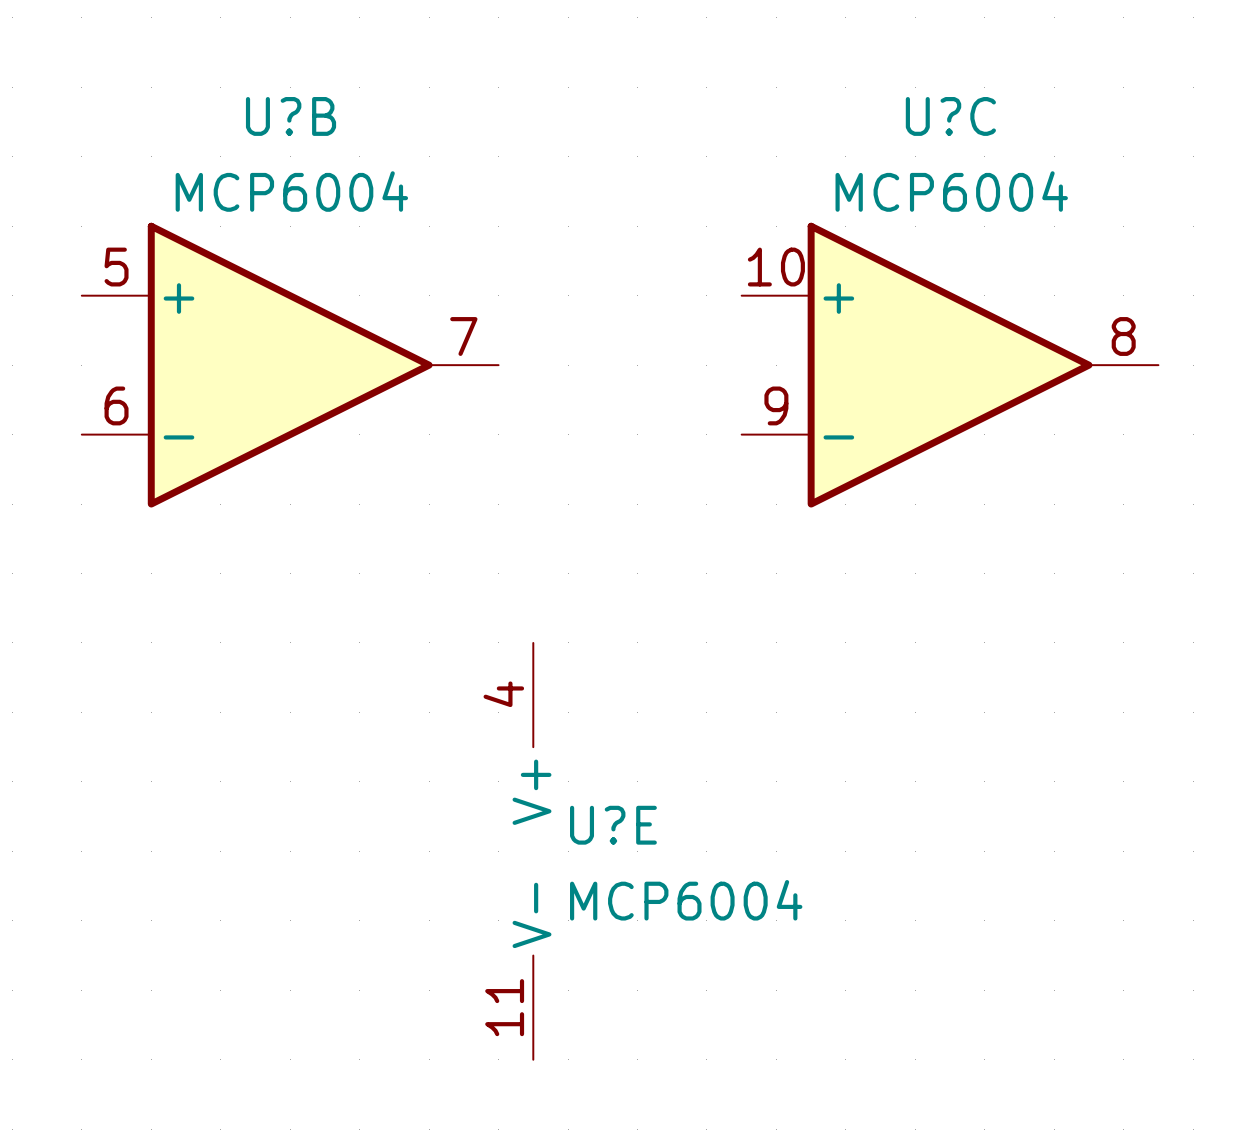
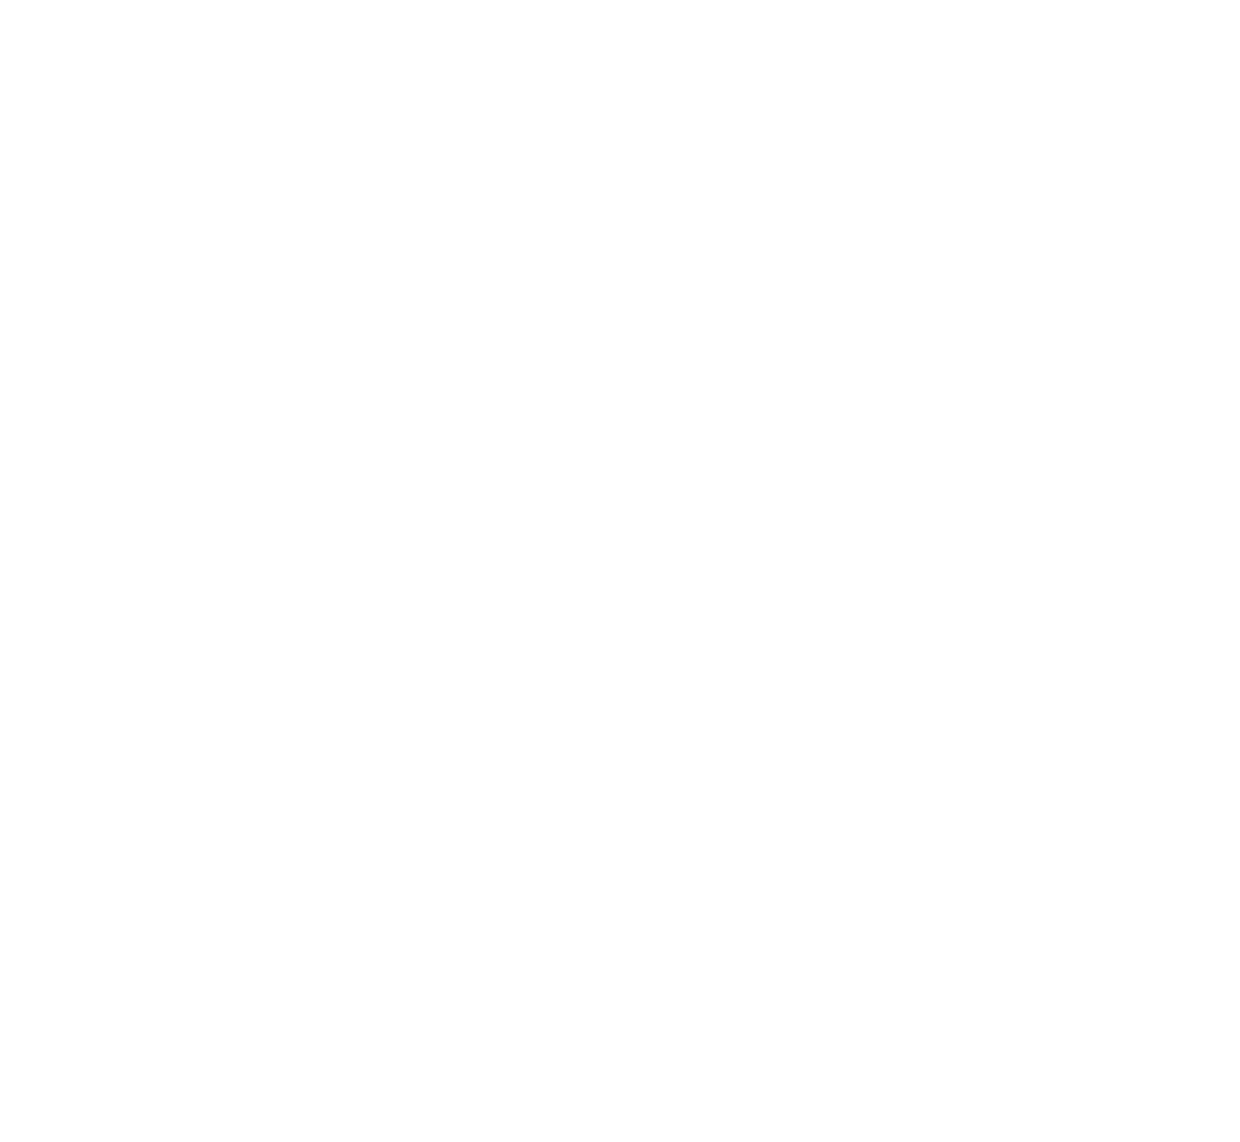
U?B: MCP6004 (290, 365) -> none
U?C: MCP6004 (950, 365) -> none
U?E: MCP6004 (533, 851) -> none

